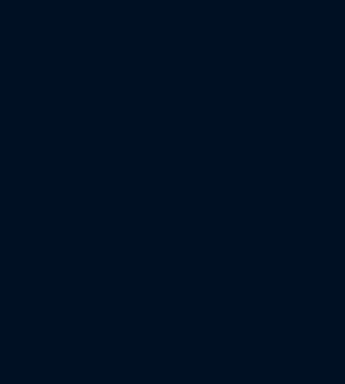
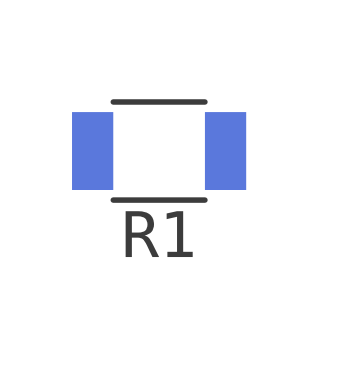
R1: none -> (159, 151)

